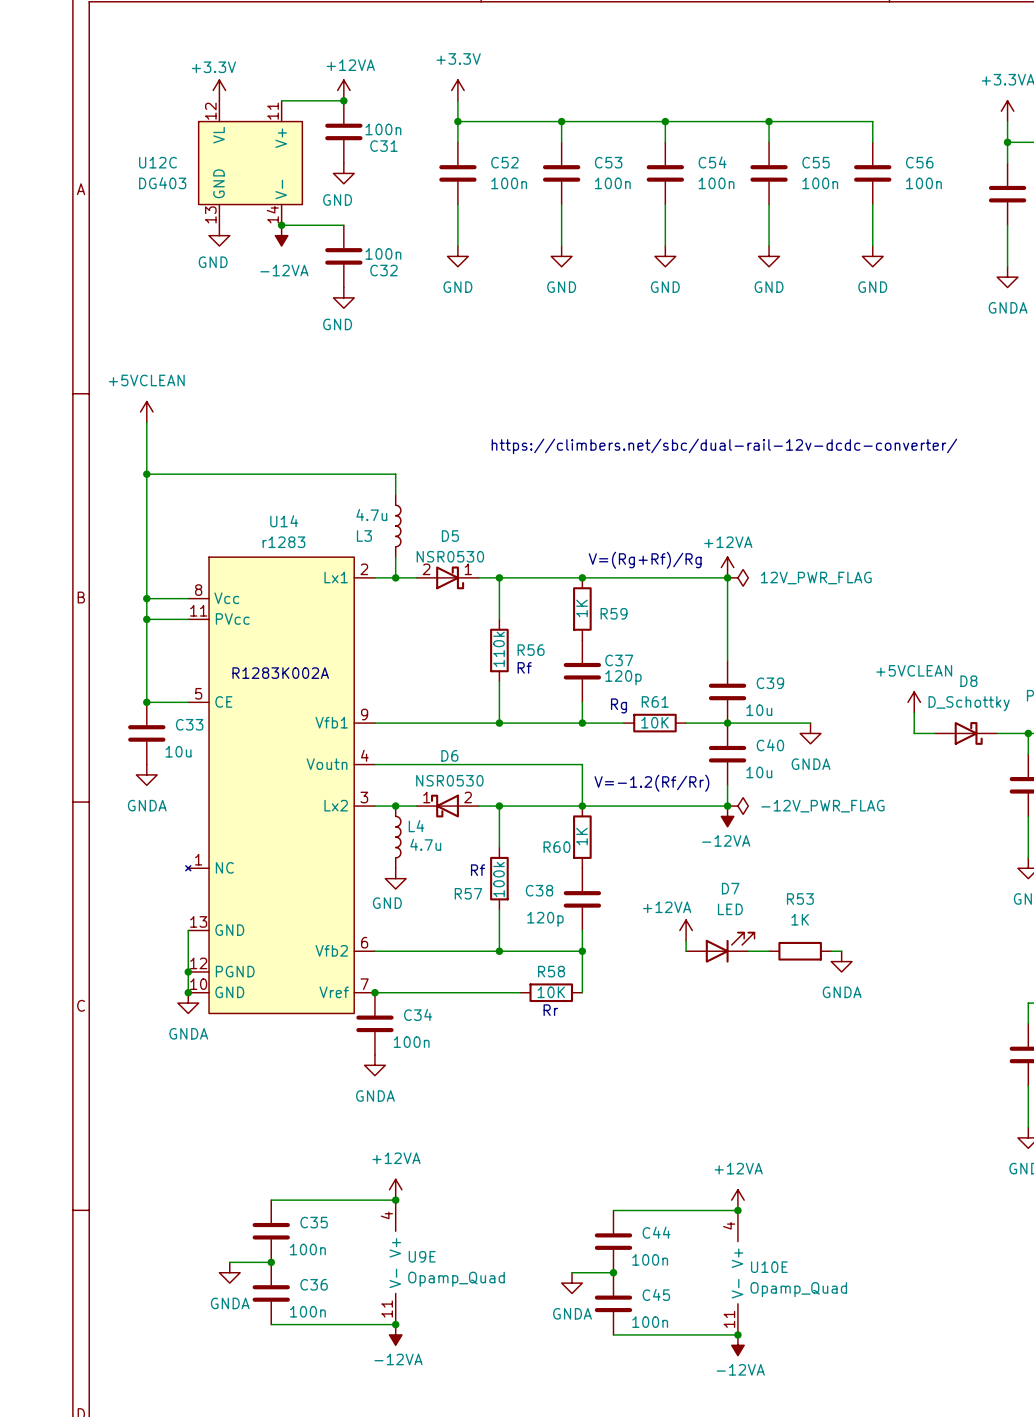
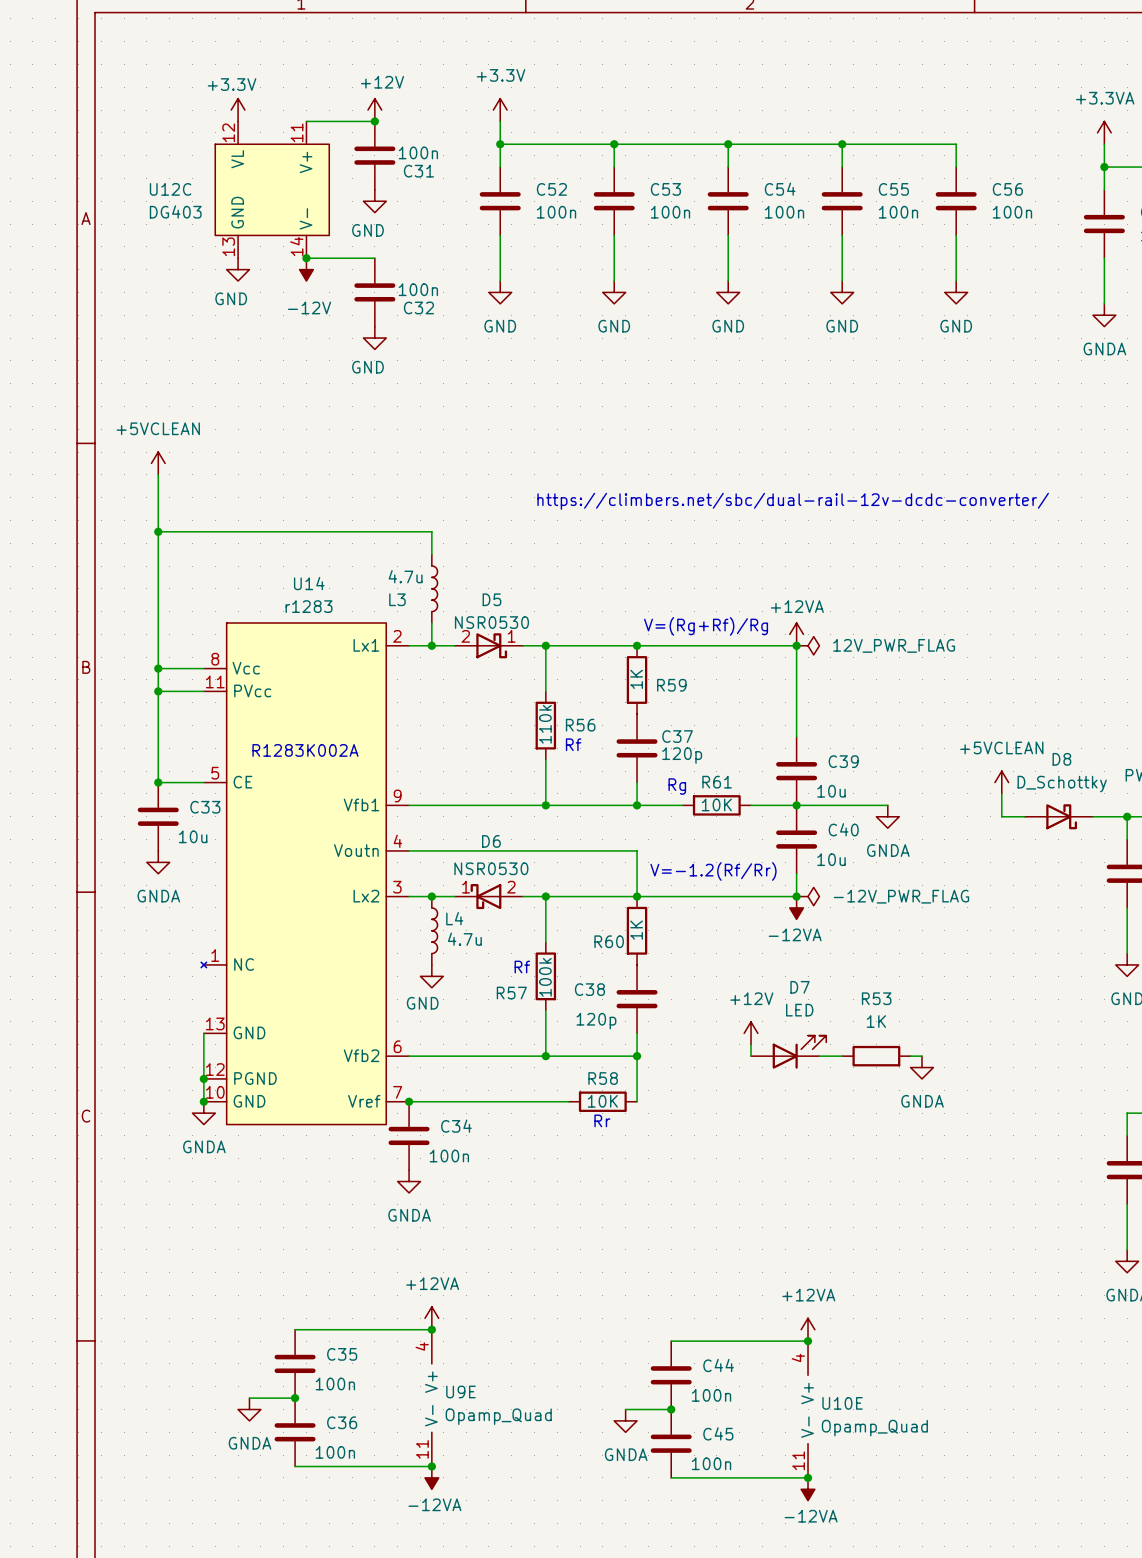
power symbol: +12VA (343, 90) -> +12V (374, 110)
power symbol: -12VA (281, 235) -> -12V (306, 269)
power symbol: +12VA (686, 930) -> +12V (751, 1033)

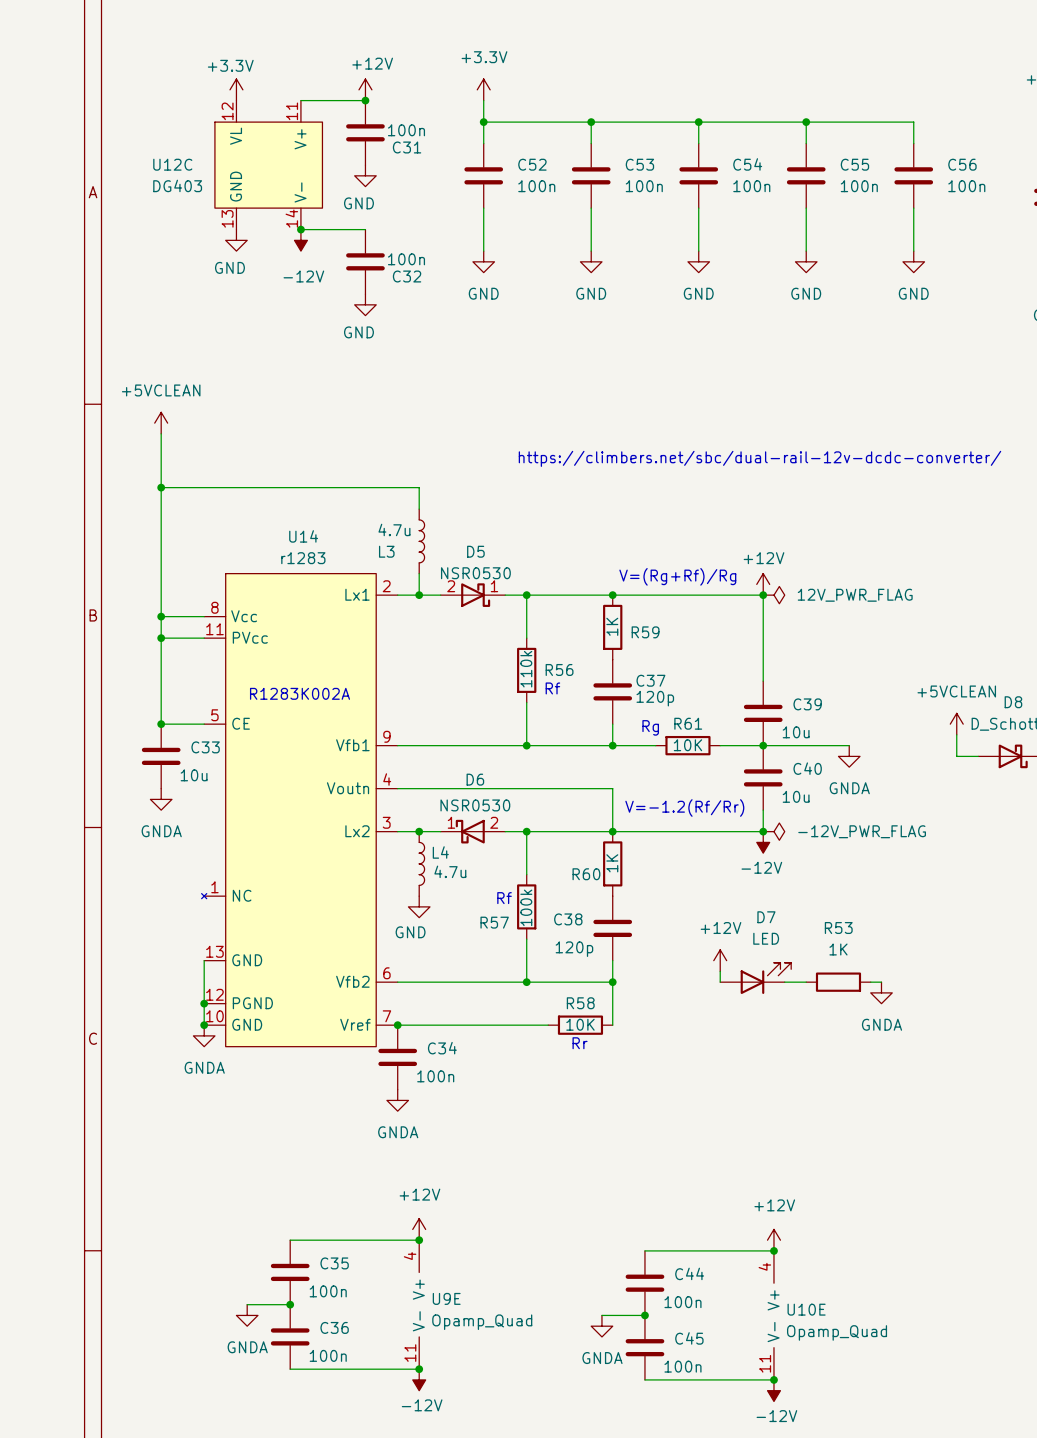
power symbol: +12VA (796, 634) -> +12V (763, 584)
power symbol: -12VA (796, 907) -> -12V (763, 842)
power symbol: +12VA (431, 1318) -> +12V (419, 1229)
power symbol: +12VA (808, 1329) -> +12V (773, 1240)
power symbol: -12VA (431, 1477) -> -12V (419, 1379)
power symbol: -12VA (808, 1489) -> -12V (773, 1390)

